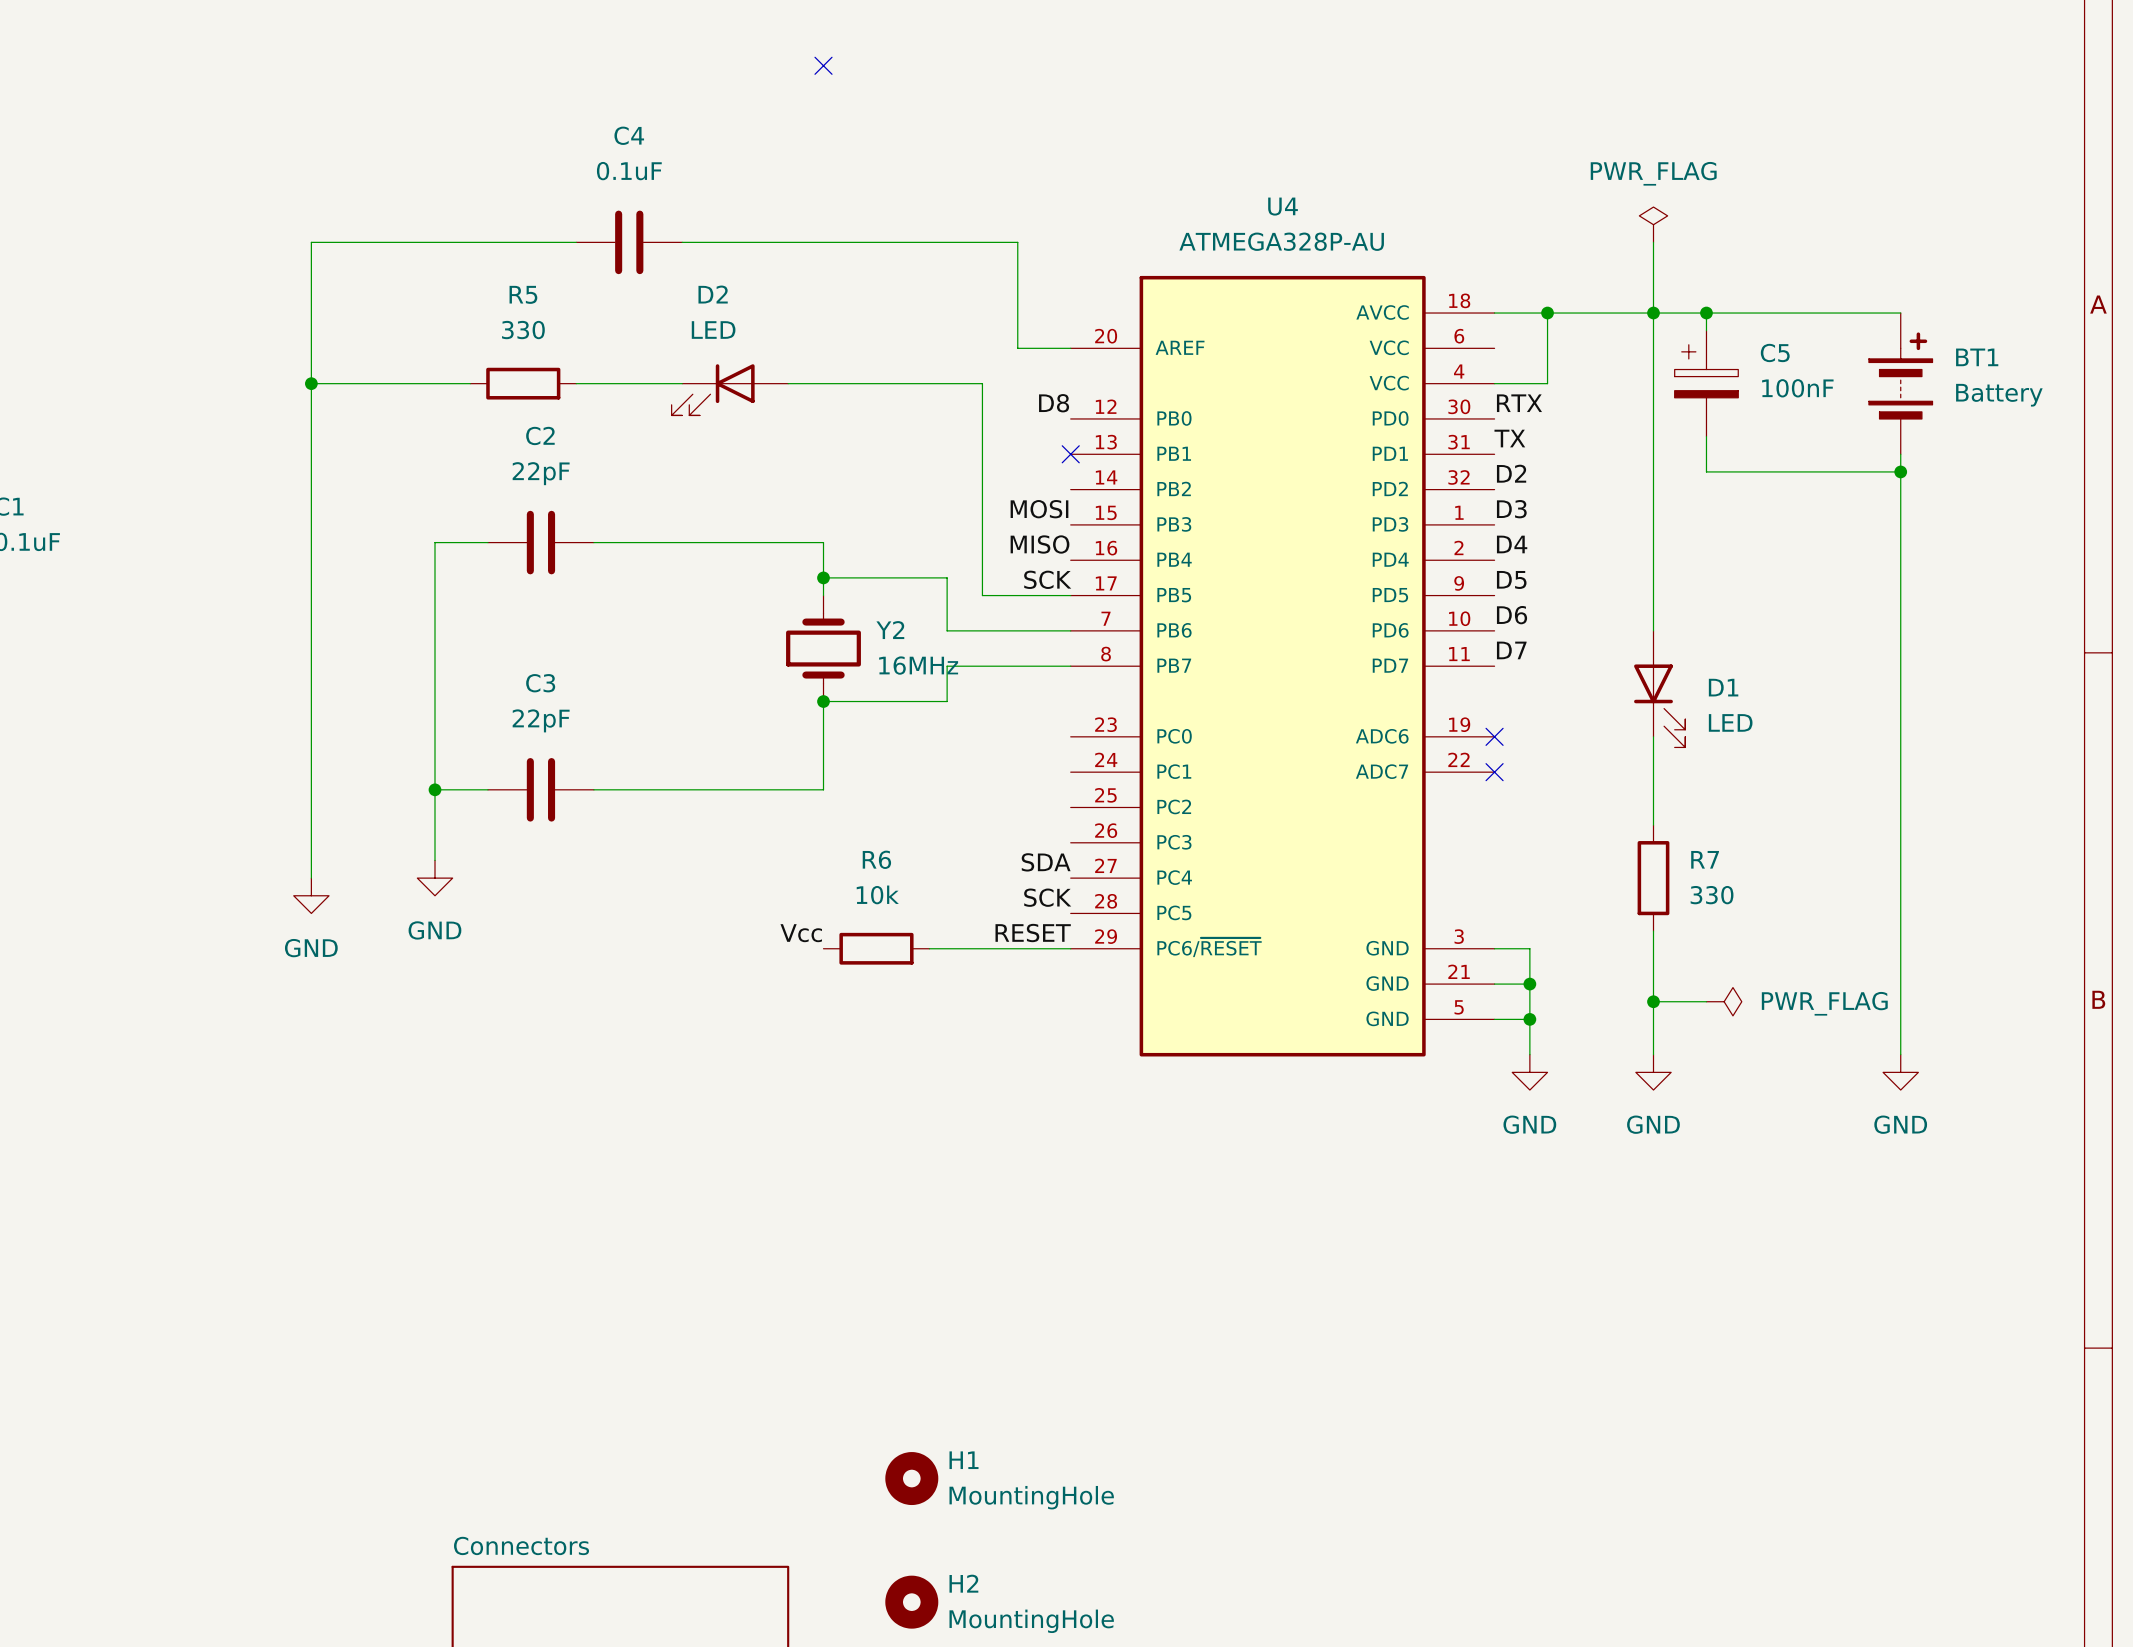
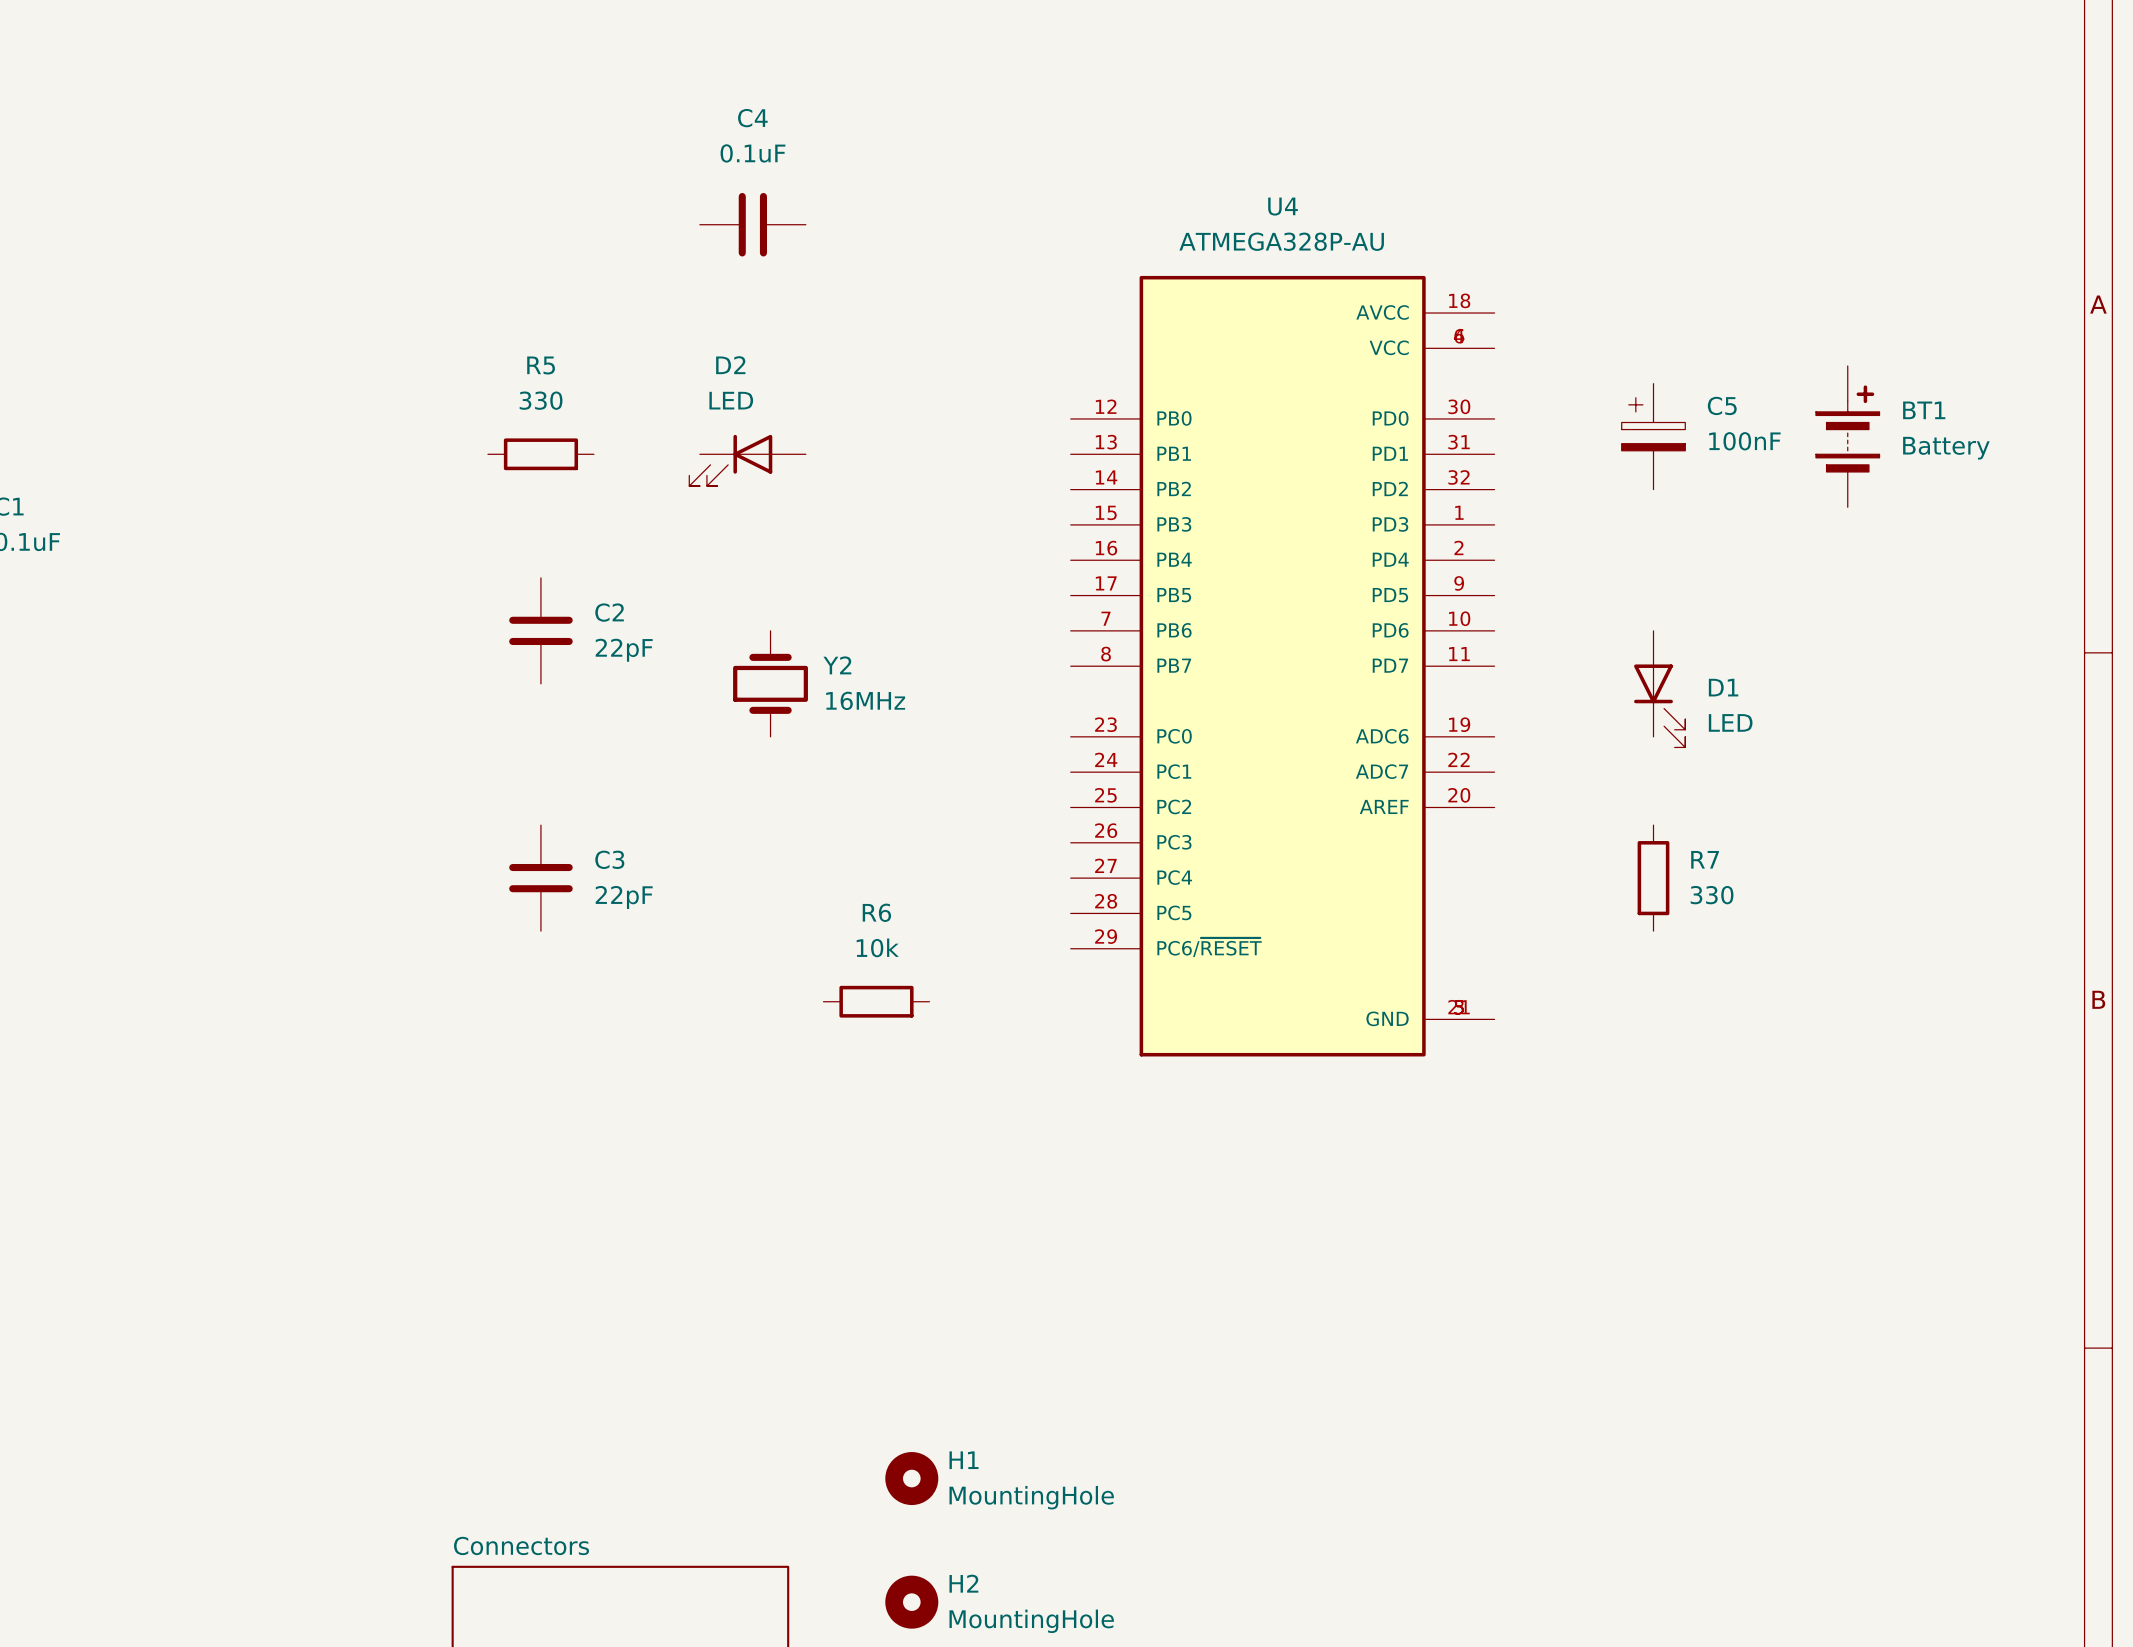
no-connect mark: (823, 65) -> none
power symbol: PWR_FLAG (1653, 224) -> none
wire: (576, 242) (311, 242) (311, 878) -> none
C4 position: (629, 242) -> (752, 224)
wire: (682, 242) (1017, 242) (1017, 348) (1070, 348) -> none
wire: (1653, 242) (1653, 630) -> none
U4 symbol: [1070, 275, 1495, 1057] -> [1070, 275, 1495, 1057]
wire: (1494, 313) (1900, 313) -> none
wire: (1547, 313) (1547, 383) (1494, 383) -> none
junction: (1547, 313) -> none
junction: (1653, 313) -> none
wire: (1706, 313) (1706, 330) -> none
junction: (1706, 313) -> none
wire: (311, 383) (470, 383) -> none
junction: (311, 383) -> none
R5 position: (523, 383) -> (540, 454)
wire: (576, 383) (682, 383) -> none
wire: (788, 383) (982, 383) (982, 595) (1070, 595) -> none
C5 position: (1706, 383) -> (1653, 436)
BT1 position: (1900, 383) -> (1847, 436)
D2 position: (729, 389) -> (747, 460)
label: D8 (1054, 403) -> none
label: RTX (1519, 403) -> none
C2 name position: C2 (540, 435) -> C2 (609, 612)
wire: (1706, 436) (1706, 471) (1900, 471) -> none
label: TX (1509, 438) -> none
no-connect mark: (1070, 454) -> none
wire: (1900, 454) (1900, 1054) -> none
junction: (1900, 471) -> none
label: D2 (1511, 473) -> none
label: MOSI (1039, 509) -> none
label: D3 (1511, 509) -> none
wire: (487, 542) (434, 542) (434, 860) -> none
C2 rotation: 0° (540, 542) -> 90° clockwise (540, 630)
C2 position: (540, 542) -> (540, 630)
wire: (593, 542) (823, 542) (823, 595) -> none
label: MISO (1040, 544) -> none
label: D4 (1512, 544) -> none
wire: (823, 577) (947, 577) (947, 630) (1070, 630) -> none
junction: (823, 577) -> none
label: SCK (1047, 579) -> none
label: D5 (1511, 579) -> none
label: D6 (1512, 615) -> none
Y2 position: (823, 648) -> (770, 683)
label: D7 (1511, 650) -> none
wire: (1070, 666) (947, 666) (947, 701) (823, 701) (823, 789) (593, 789) -> none
C3 name position: C3 (540, 683) -> C3 (609, 859)
junction: (823, 701) -> none
no-connect mark: (1494, 736) -> none
wire: (1653, 736) (1653, 825) -> none
no-connect mark: (1494, 772) -> none
wire: (434, 789) (487, 789) -> none
junction: (434, 789) -> none
C3 rotation: 0° (540, 789) -> 90° clockwise (540, 878)
C3 position: (540, 789) -> (540, 878)
label: SDA (1046, 862) -> none
power symbol: GND (434, 878) -> none
power symbol: GND (311, 895) -> none
label: SCK (1047, 897) -> none
wire: (1653, 931) (1653, 1054) -> none
label: Vcc (801, 933) -> none
label: RESET (1033, 933) -> none
R6 position: (876, 948) -> (876, 1001)
wire: (929, 948) (1070, 948) -> none
wire: (1494, 948) (1529, 948) (1529, 1054) -> none
wire: (1494, 984) (1529, 984) -> none
junction: (1529, 984) -> none
wire: (1653, 1001) (1706, 1001) -> none
junction: (1653, 1001) -> none
power symbol: PWR_FLAG (1724, 1001) -> none
wire: (1494, 1019) (1529, 1019) -> none
junction: (1529, 1019) -> none
power symbol: GND (1529, 1072) -> none
power symbol: GND (1653, 1072) -> none
power symbol: GND (1900, 1072) -> none

